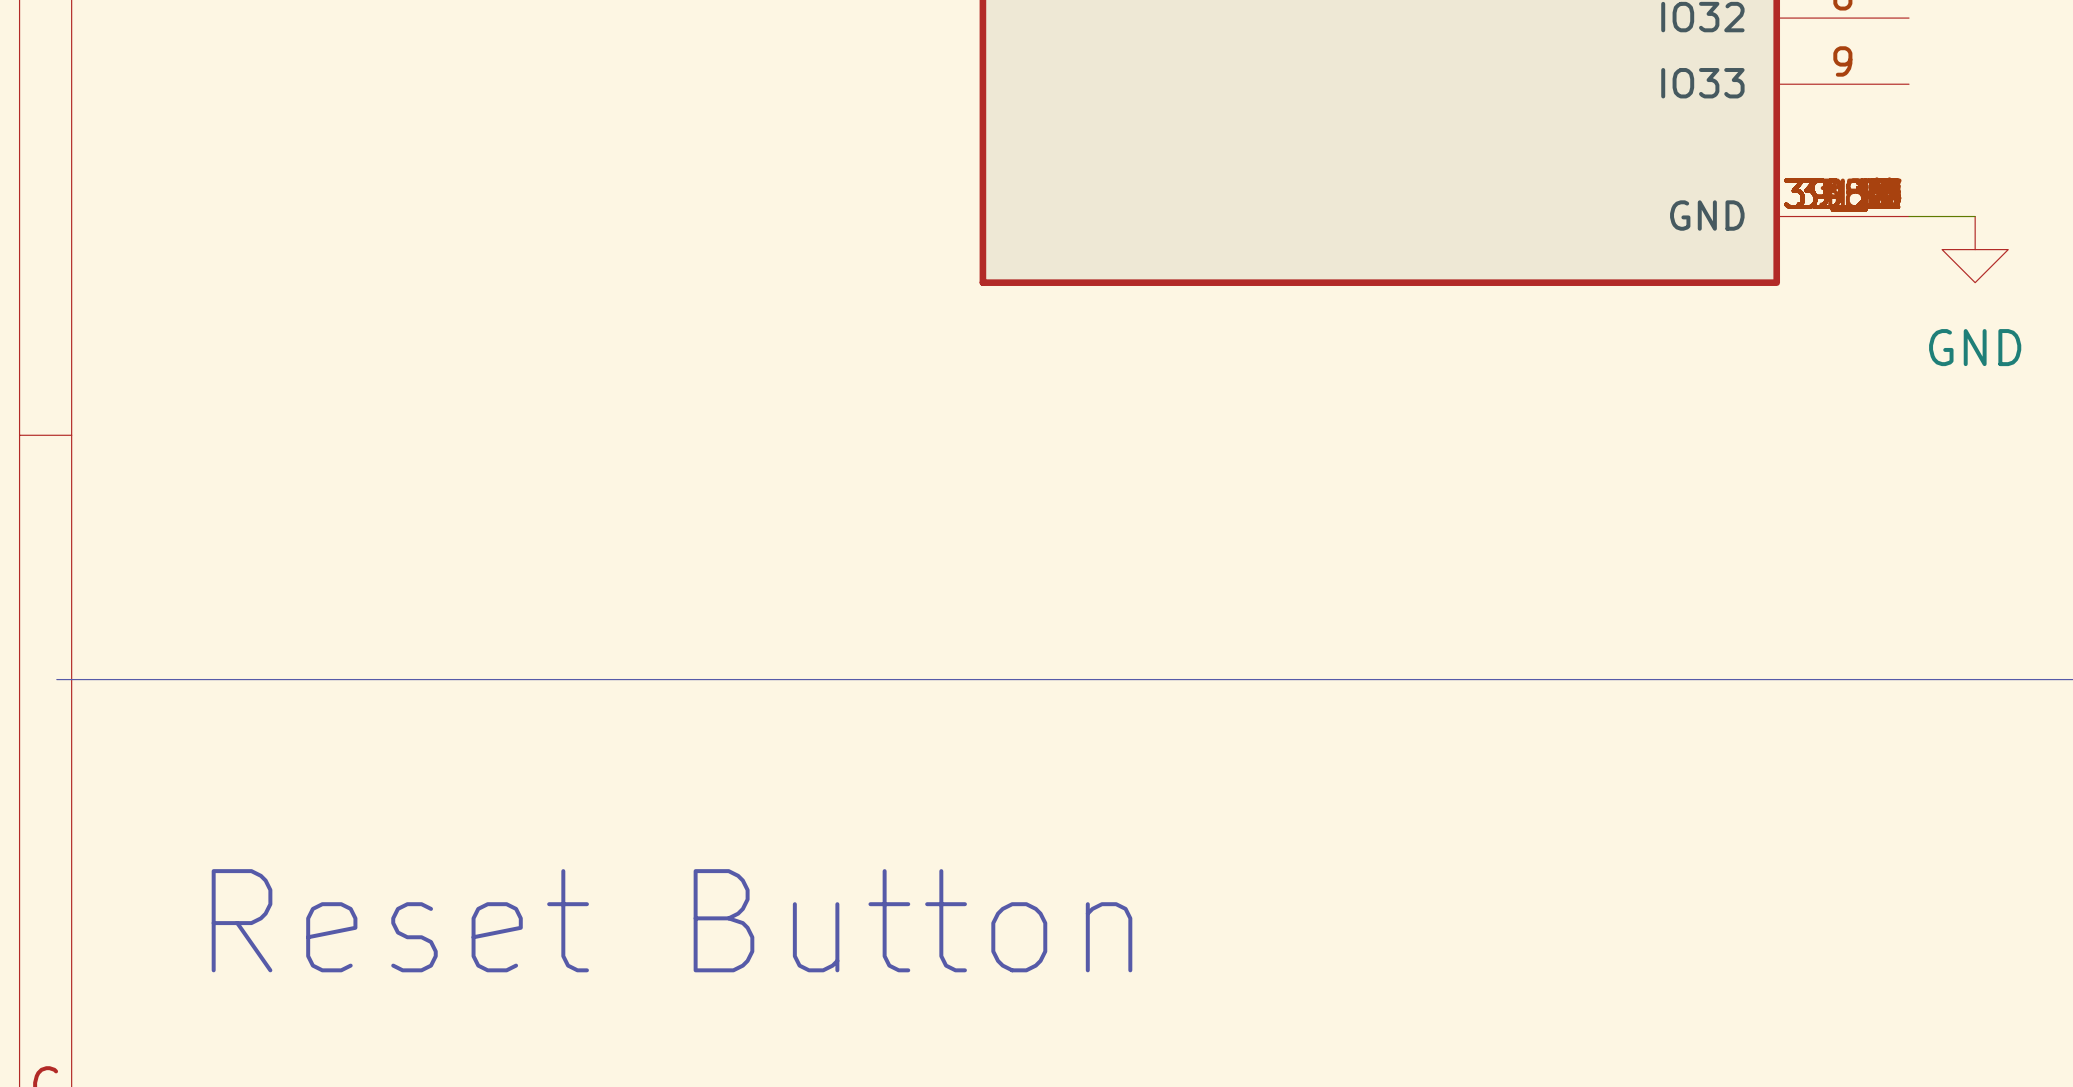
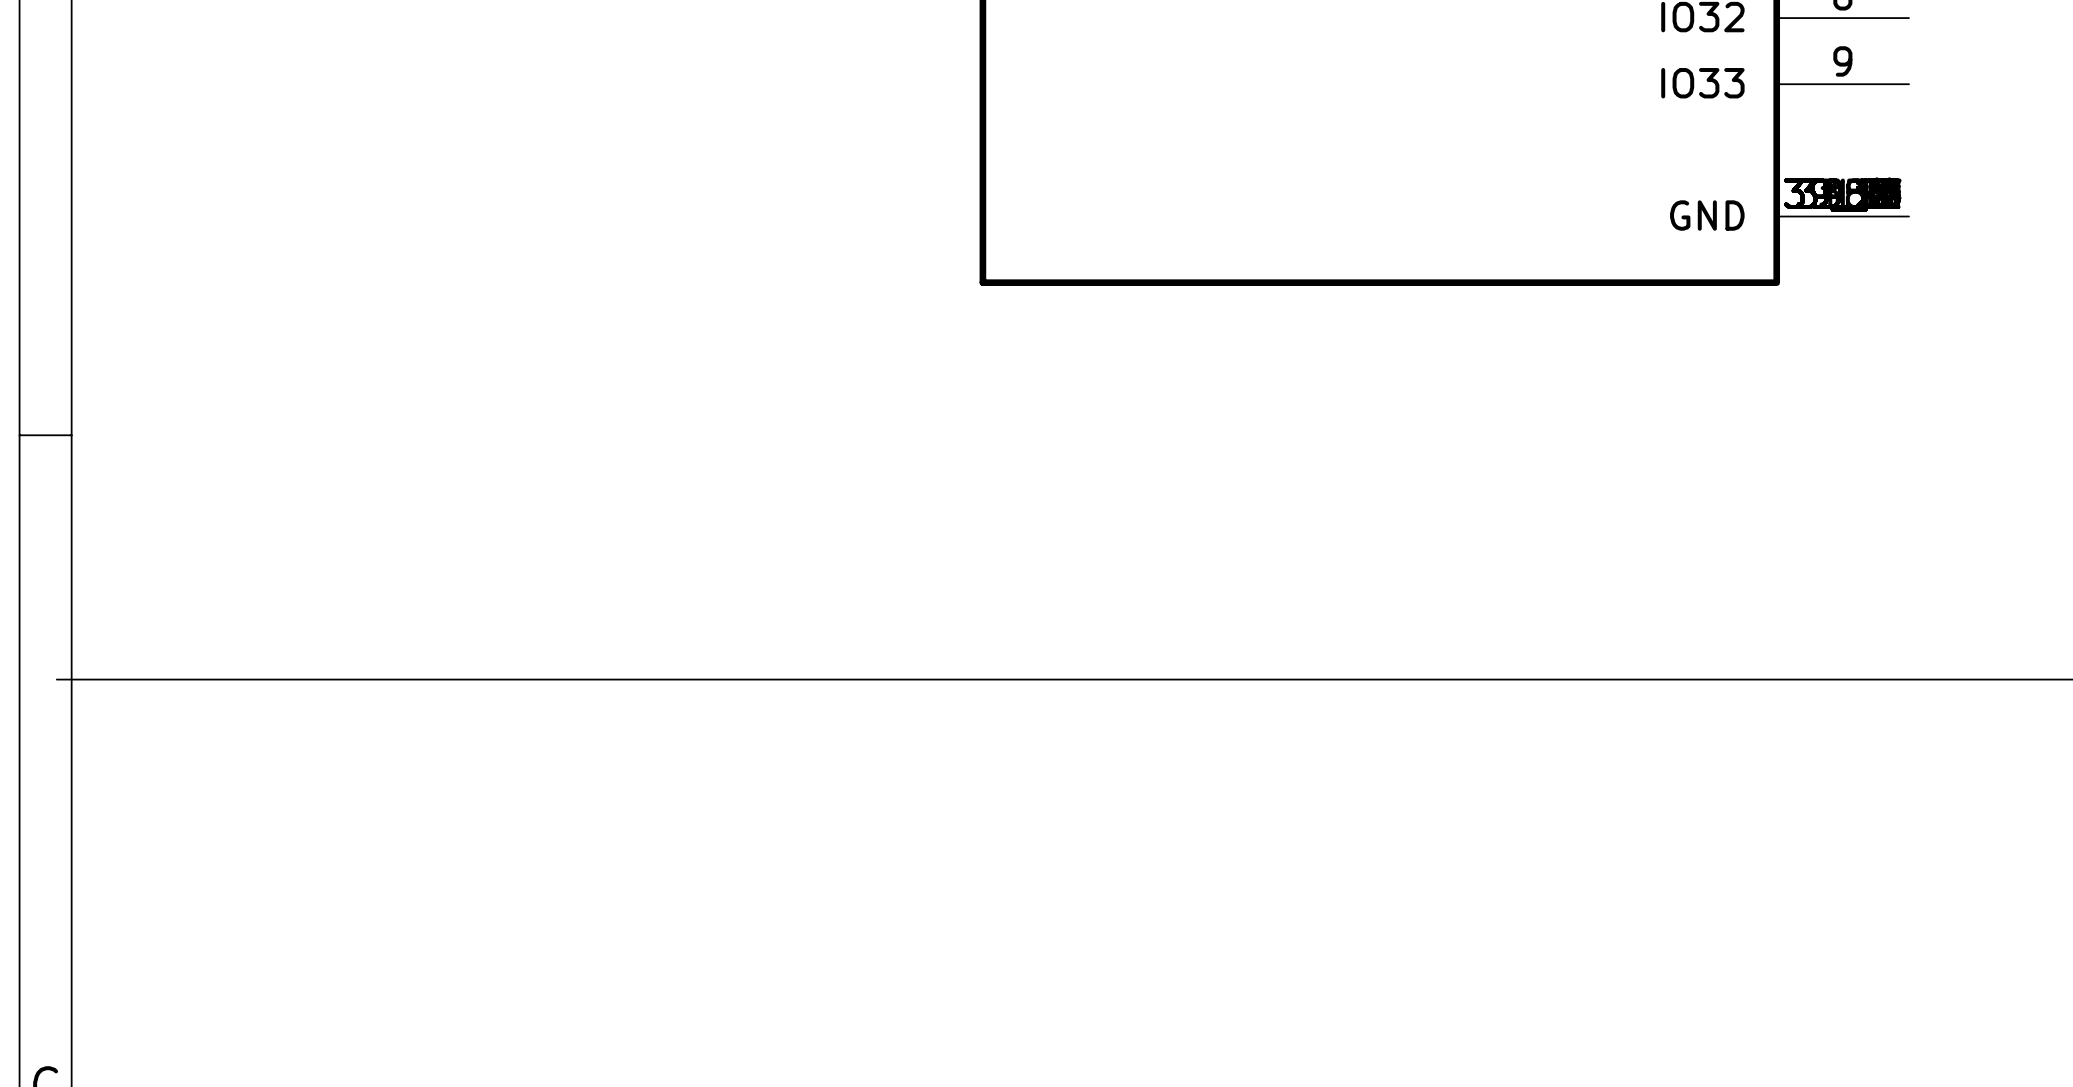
wire: (1909, 216) (1975, 216) -> none
power symbol: GND (1975, 249) -> none
text: Reset Button (672, 920) -> none

